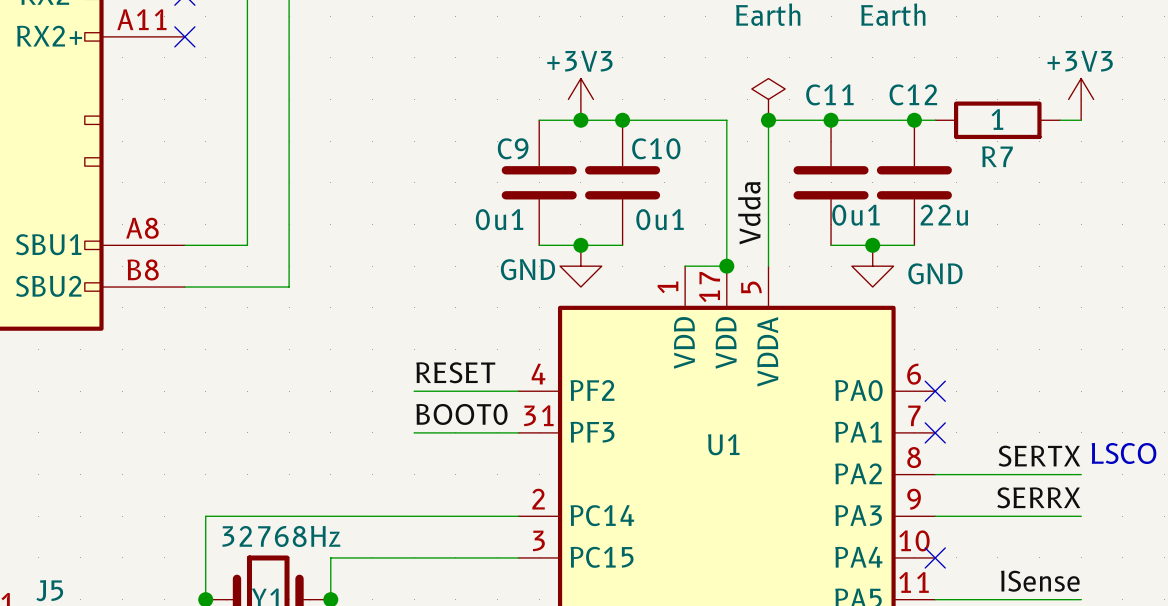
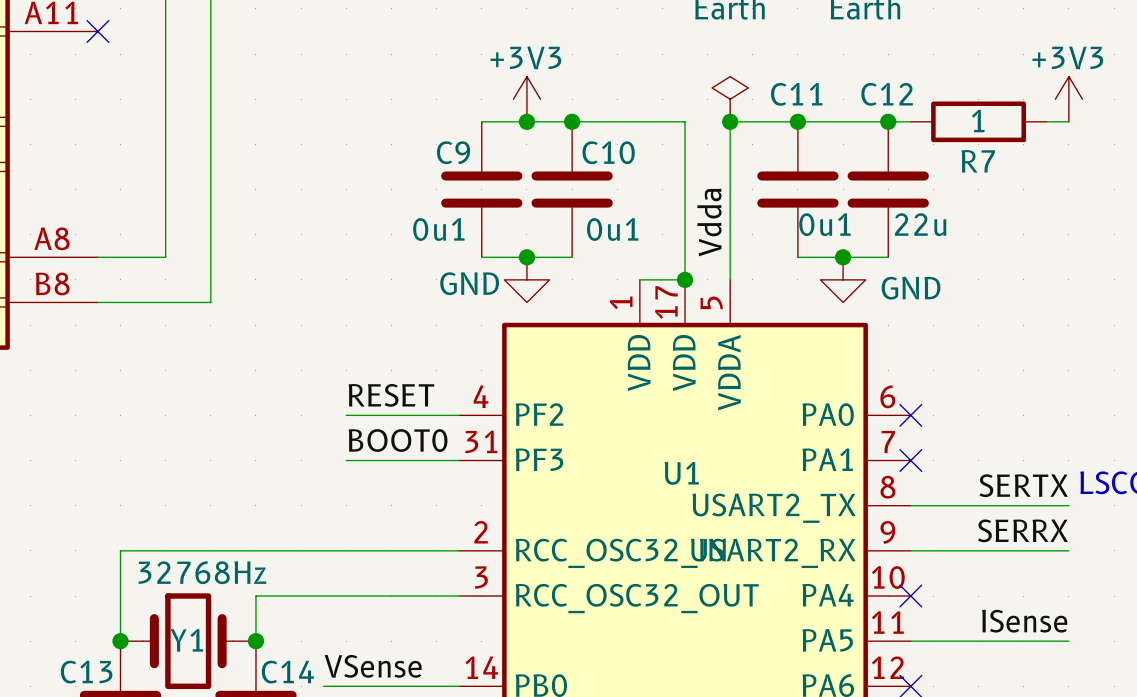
U1 pin name: PA2 (858, 473) -> USART2_TX (774, 508)
U1 pin name: PC14 (602, 515) -> RCC_OSC32_IN (620, 553)
U1 pin name: PA3 (858, 515) -> USART2_RX (773, 553)
U1 pin name: PC15 (602, 557) -> RCC_OSC32_OUT (637, 598)

